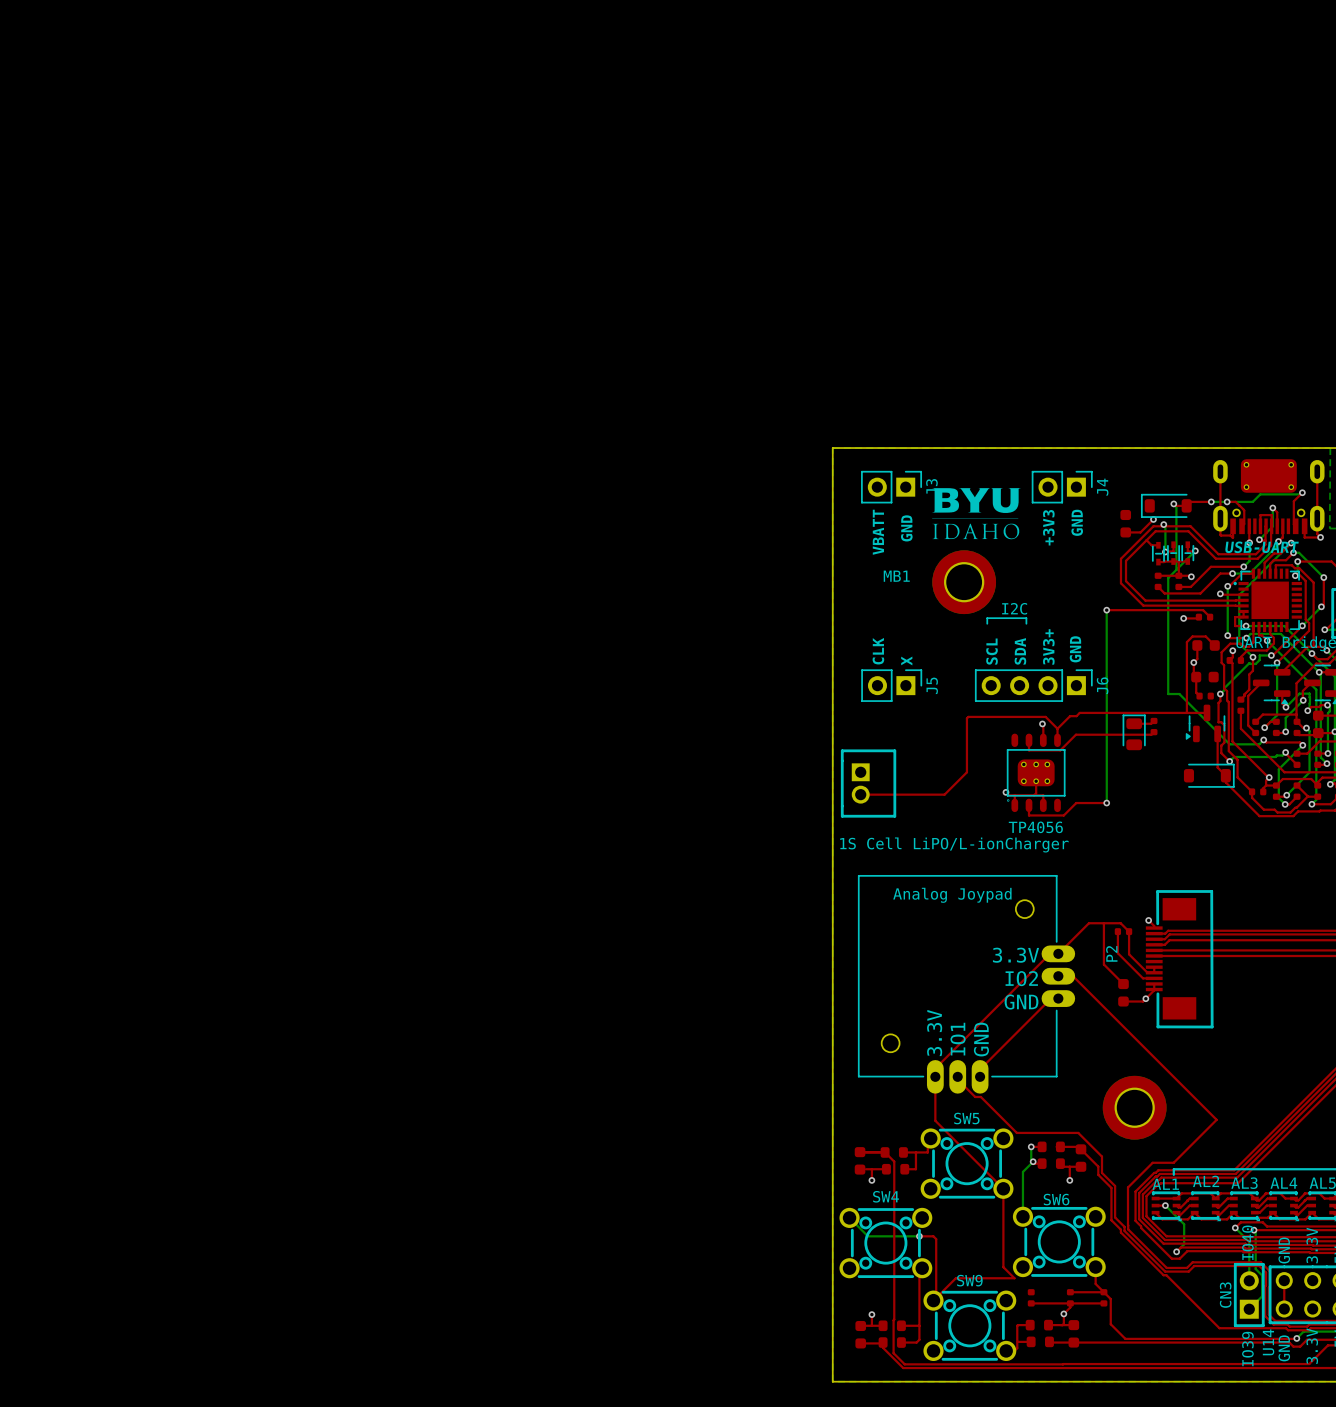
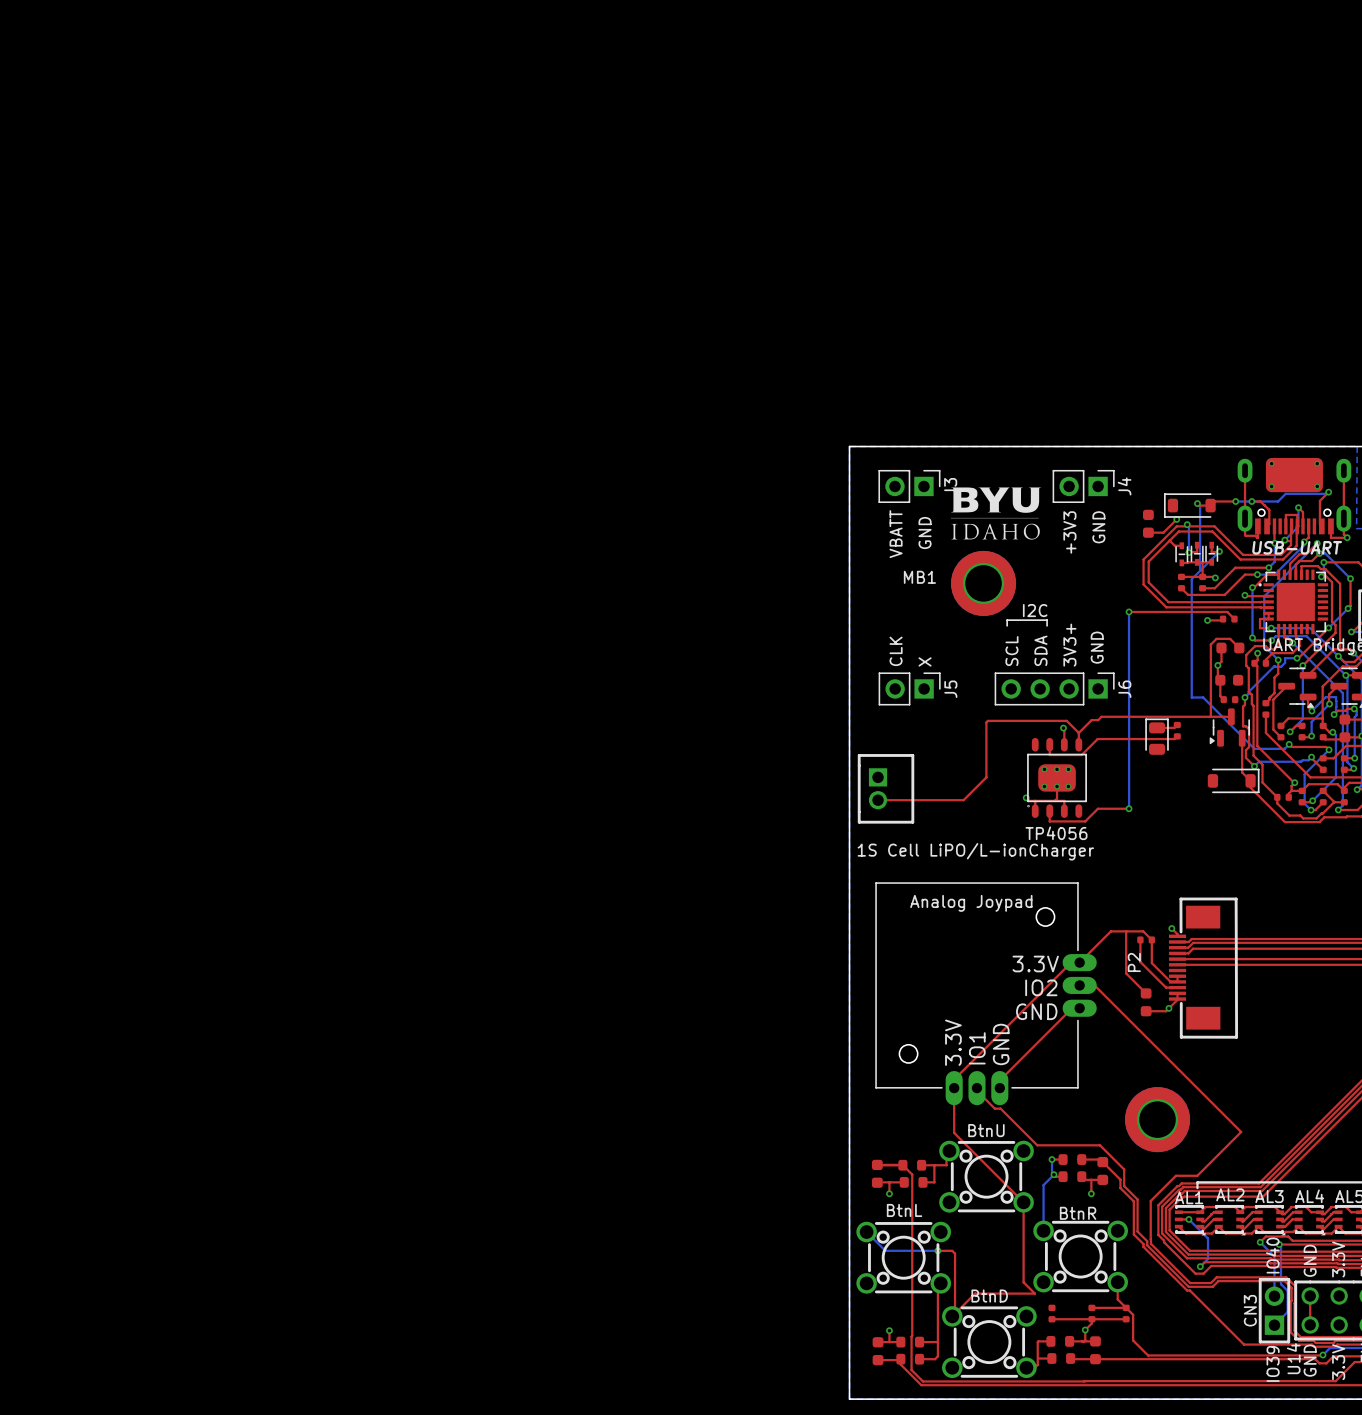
SW5 name: SW5 (966, 1118) -> BtnU (986, 1130)
SW4 name: SW4 (886, 1196) -> BtnL (904, 1210)
SW6 name: SW6 (1056, 1199) -> BtnR (1078, 1213)
SW9 name: SW9 (969, 1280) -> BtnD (989, 1296)

